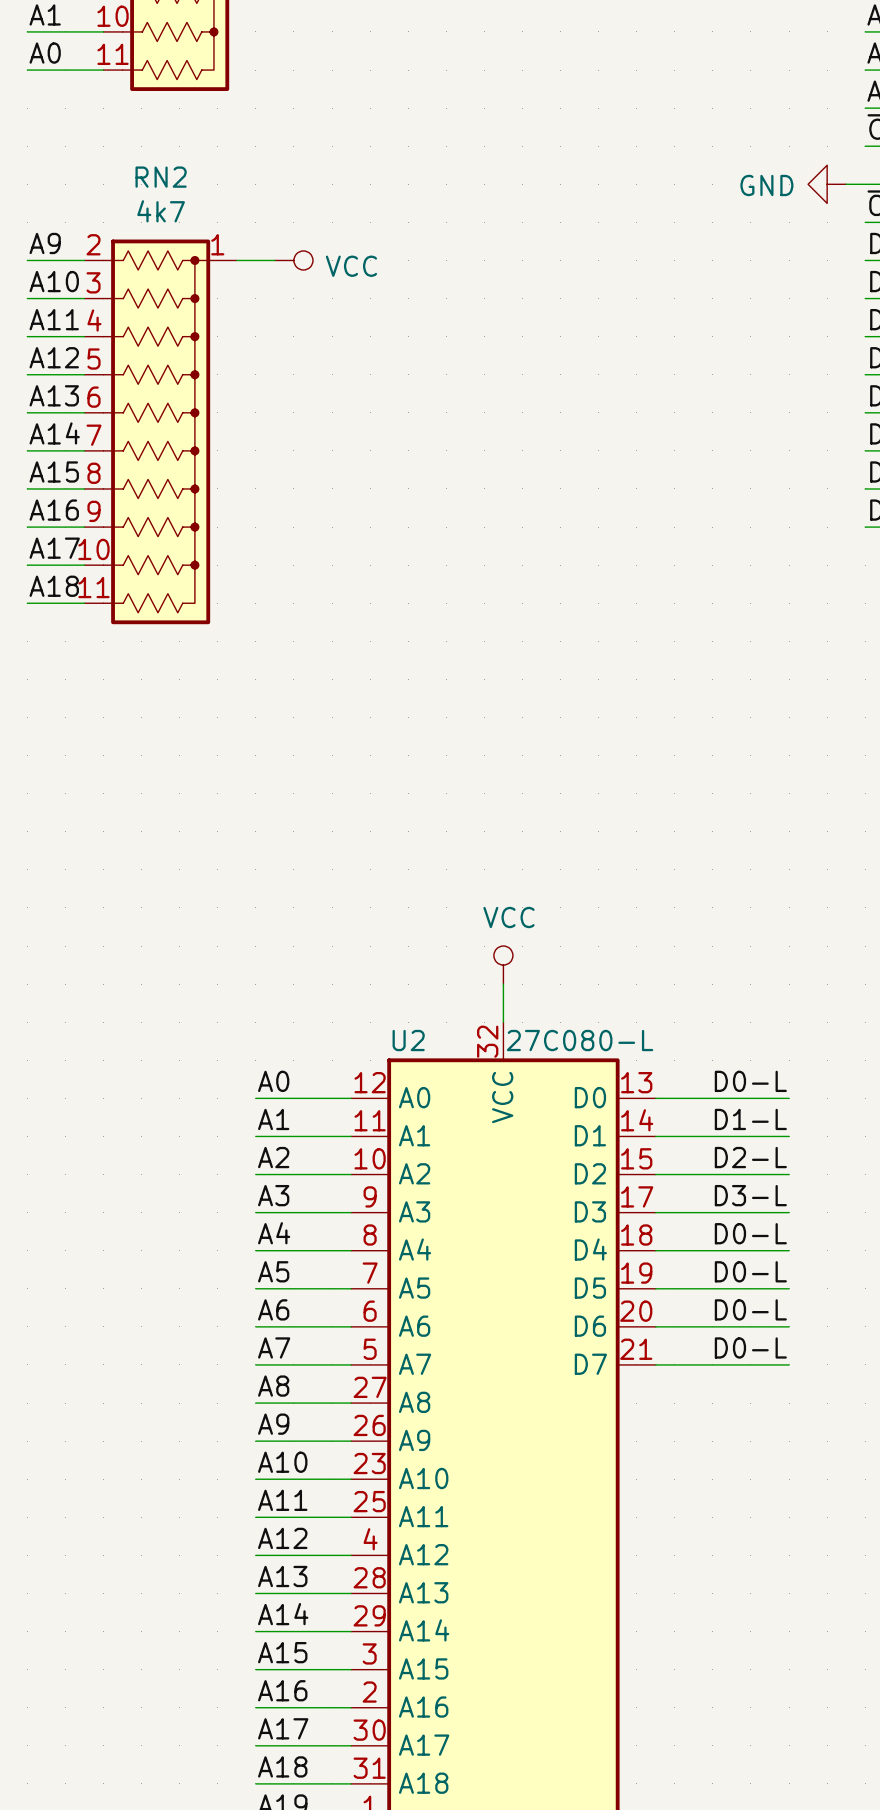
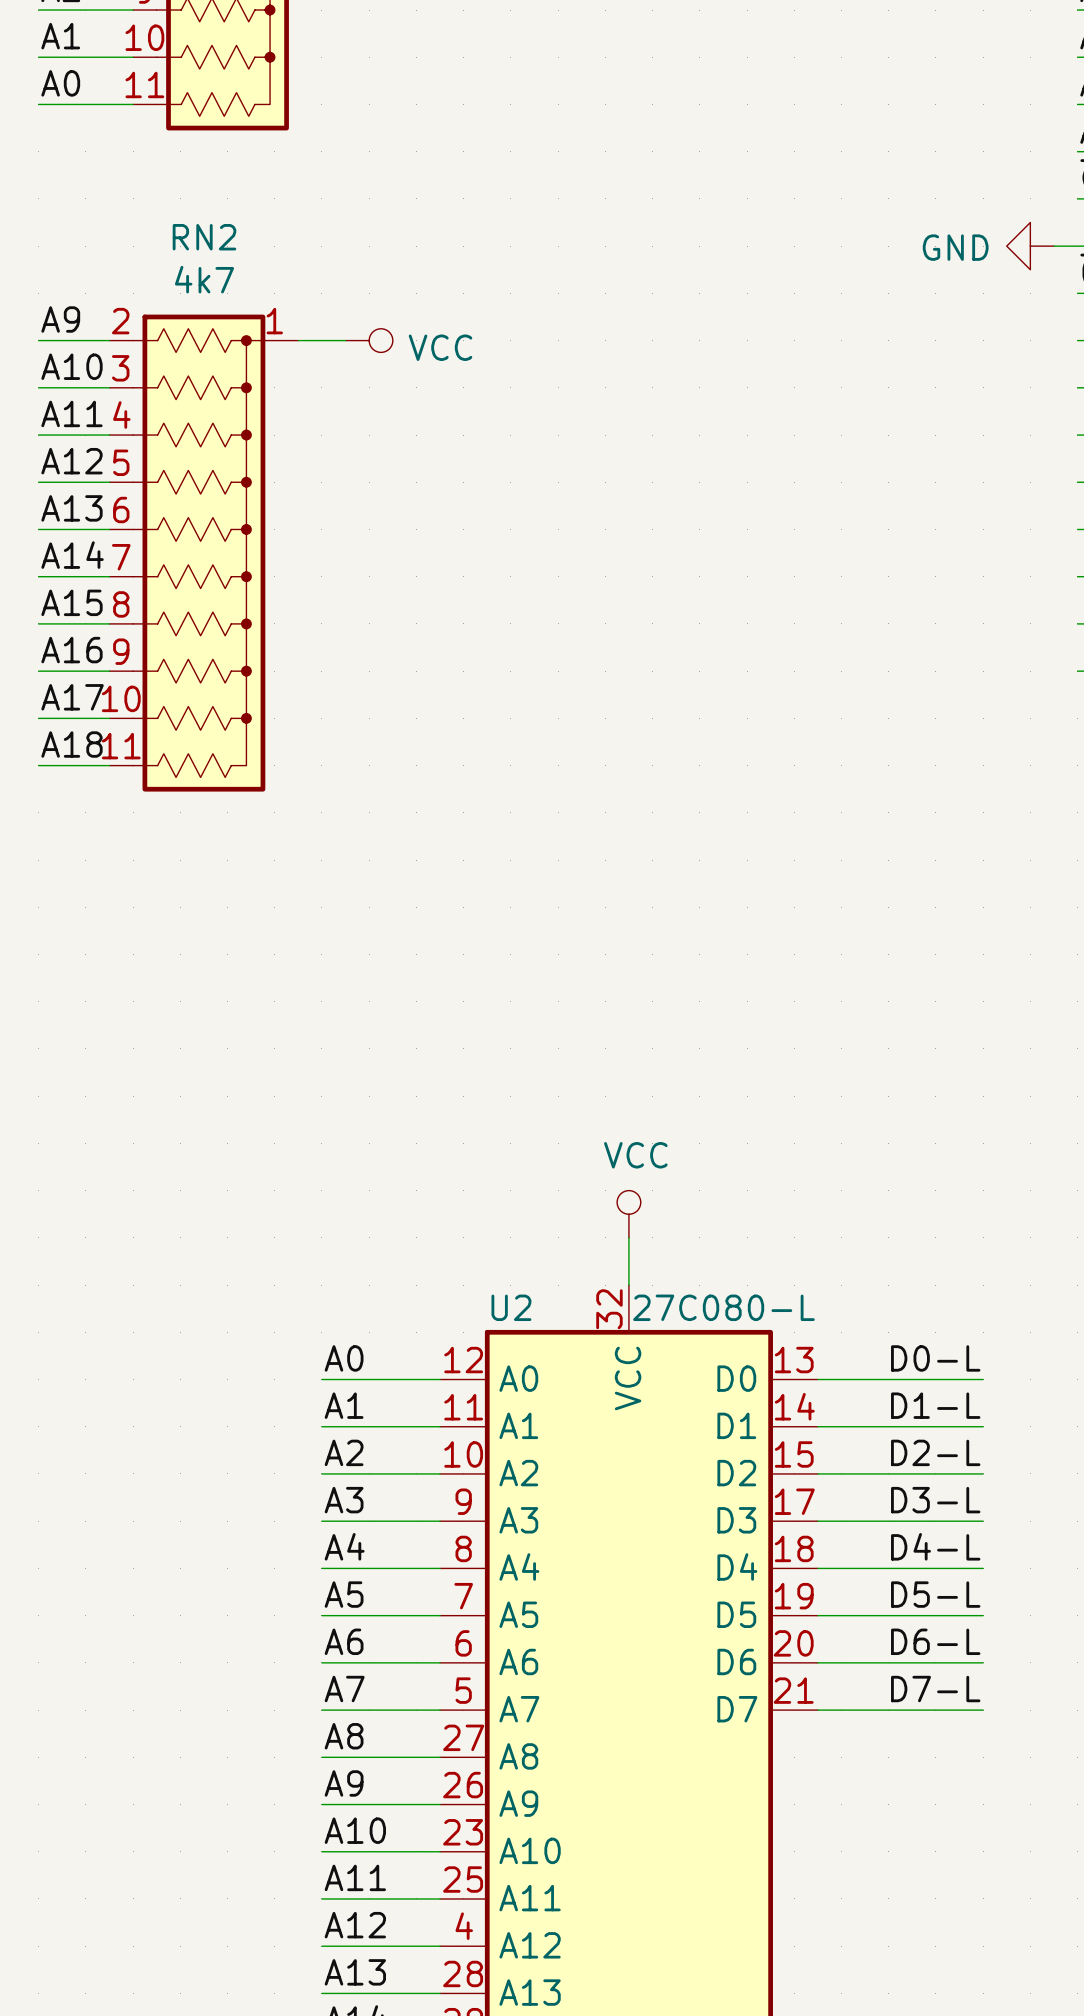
label: D0-L (750, 1233) -> D4-L (935, 1546)
label: D0-L (750, 1271) -> D5-L (935, 1594)
label: D0-L (750, 1309) -> D6-L (935, 1641)
label: D0-L (750, 1347) -> D7-L (935, 1689)

